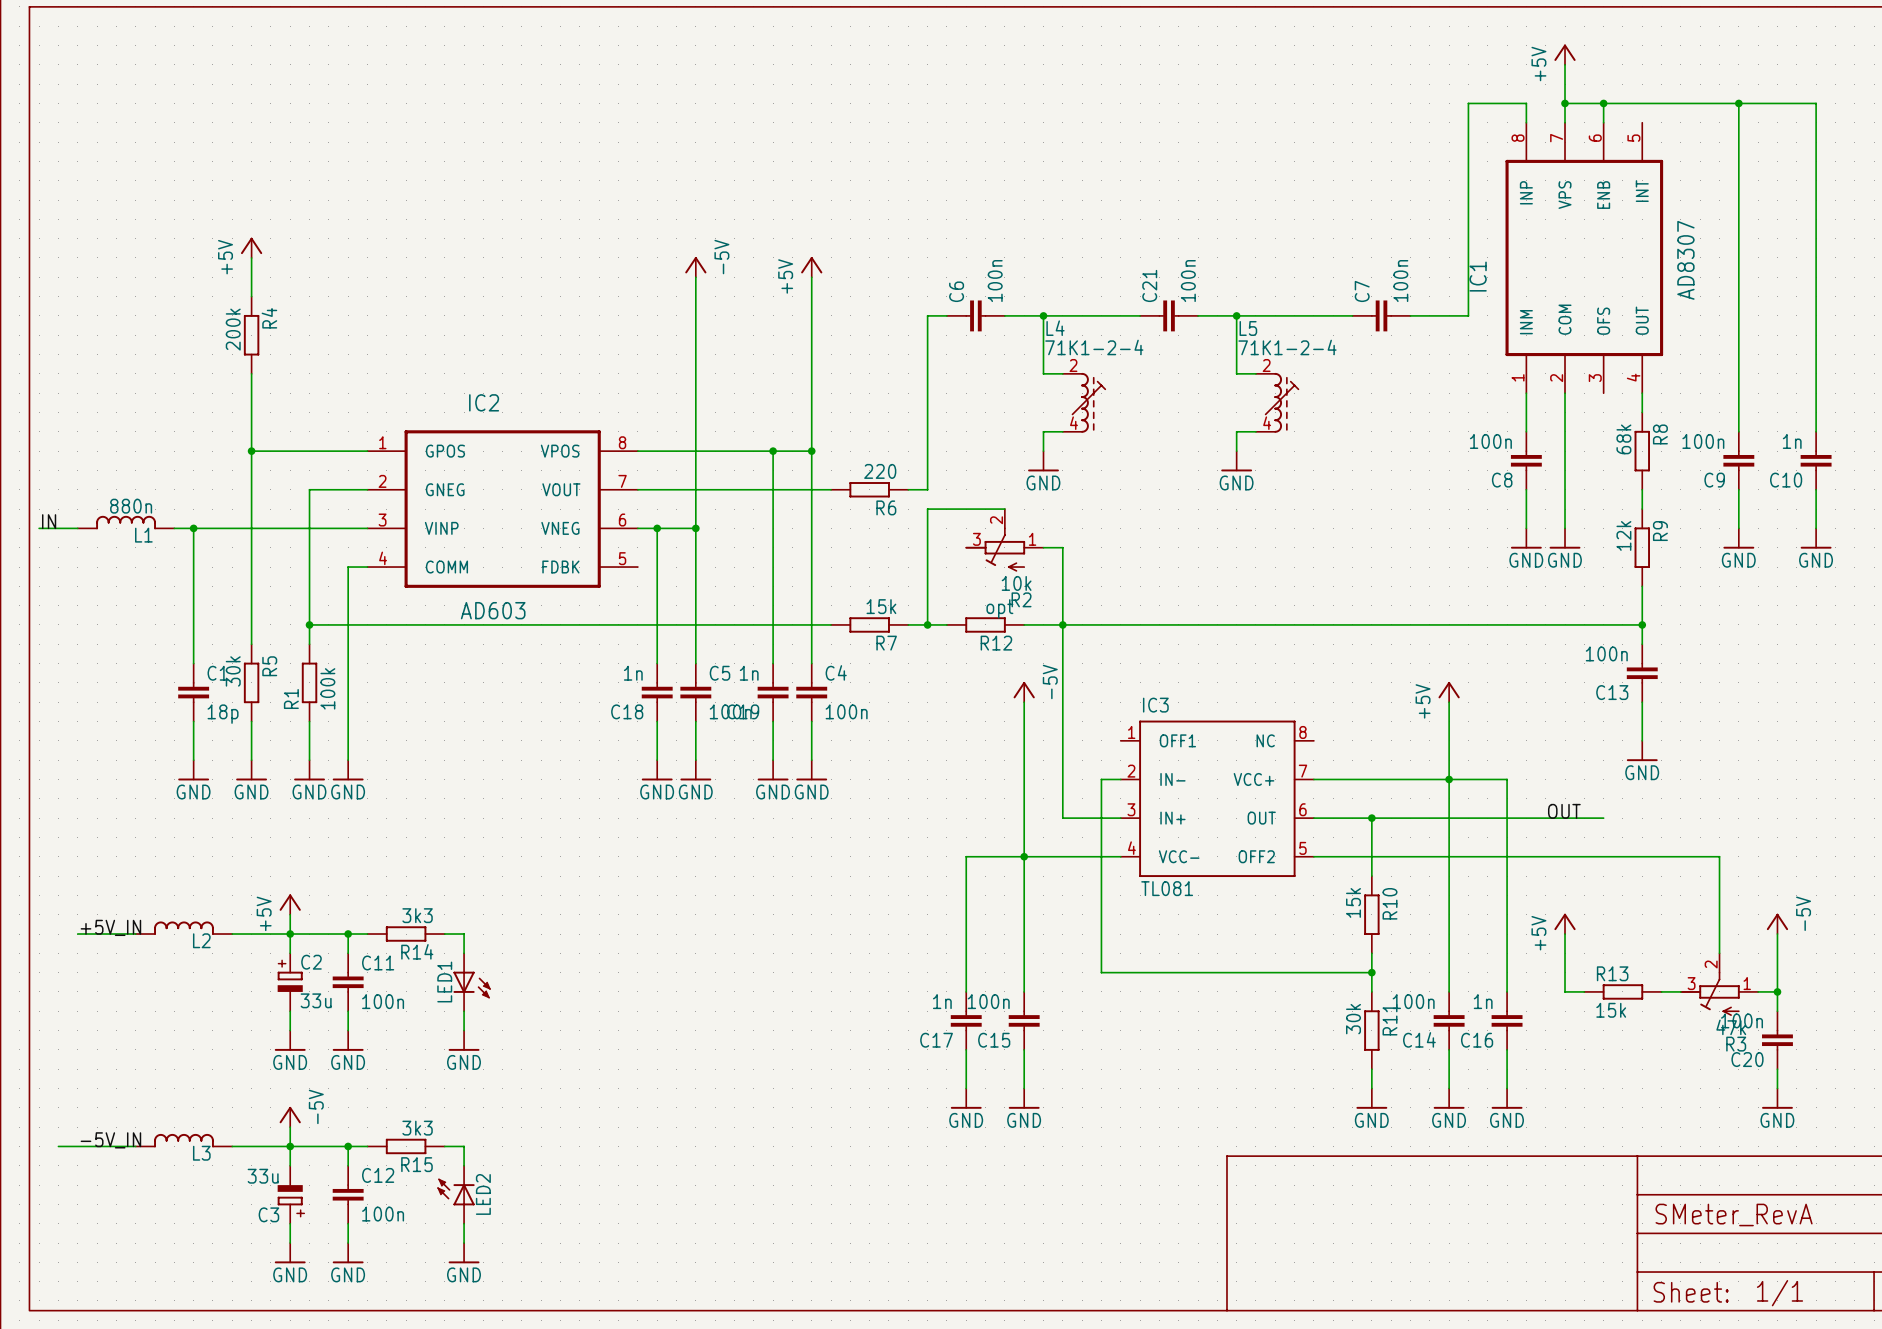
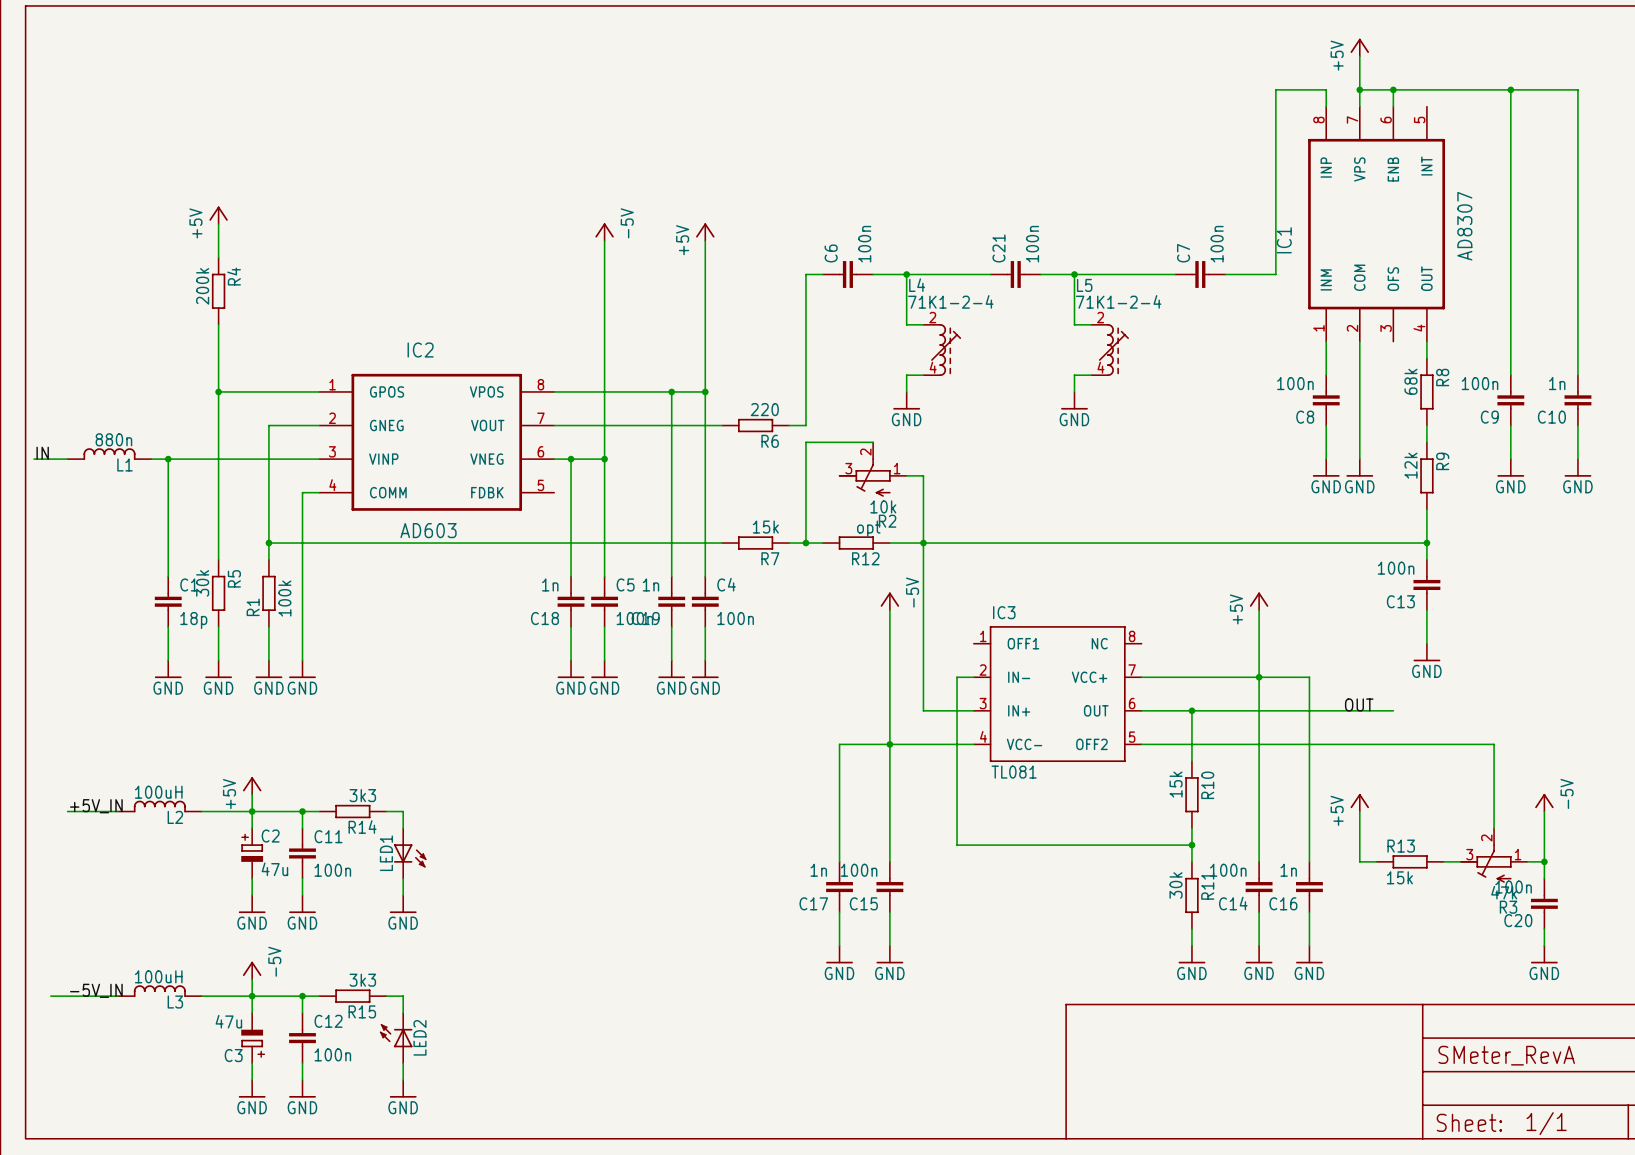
L2 value: none -> 100uH (158, 792)
C2 value: 33u (316, 1000) -> 47u (274, 869)
L3 value: none -> 100uH (158, 976)
C3 value: 33u (263, 1176) -> 47u (228, 1021)

